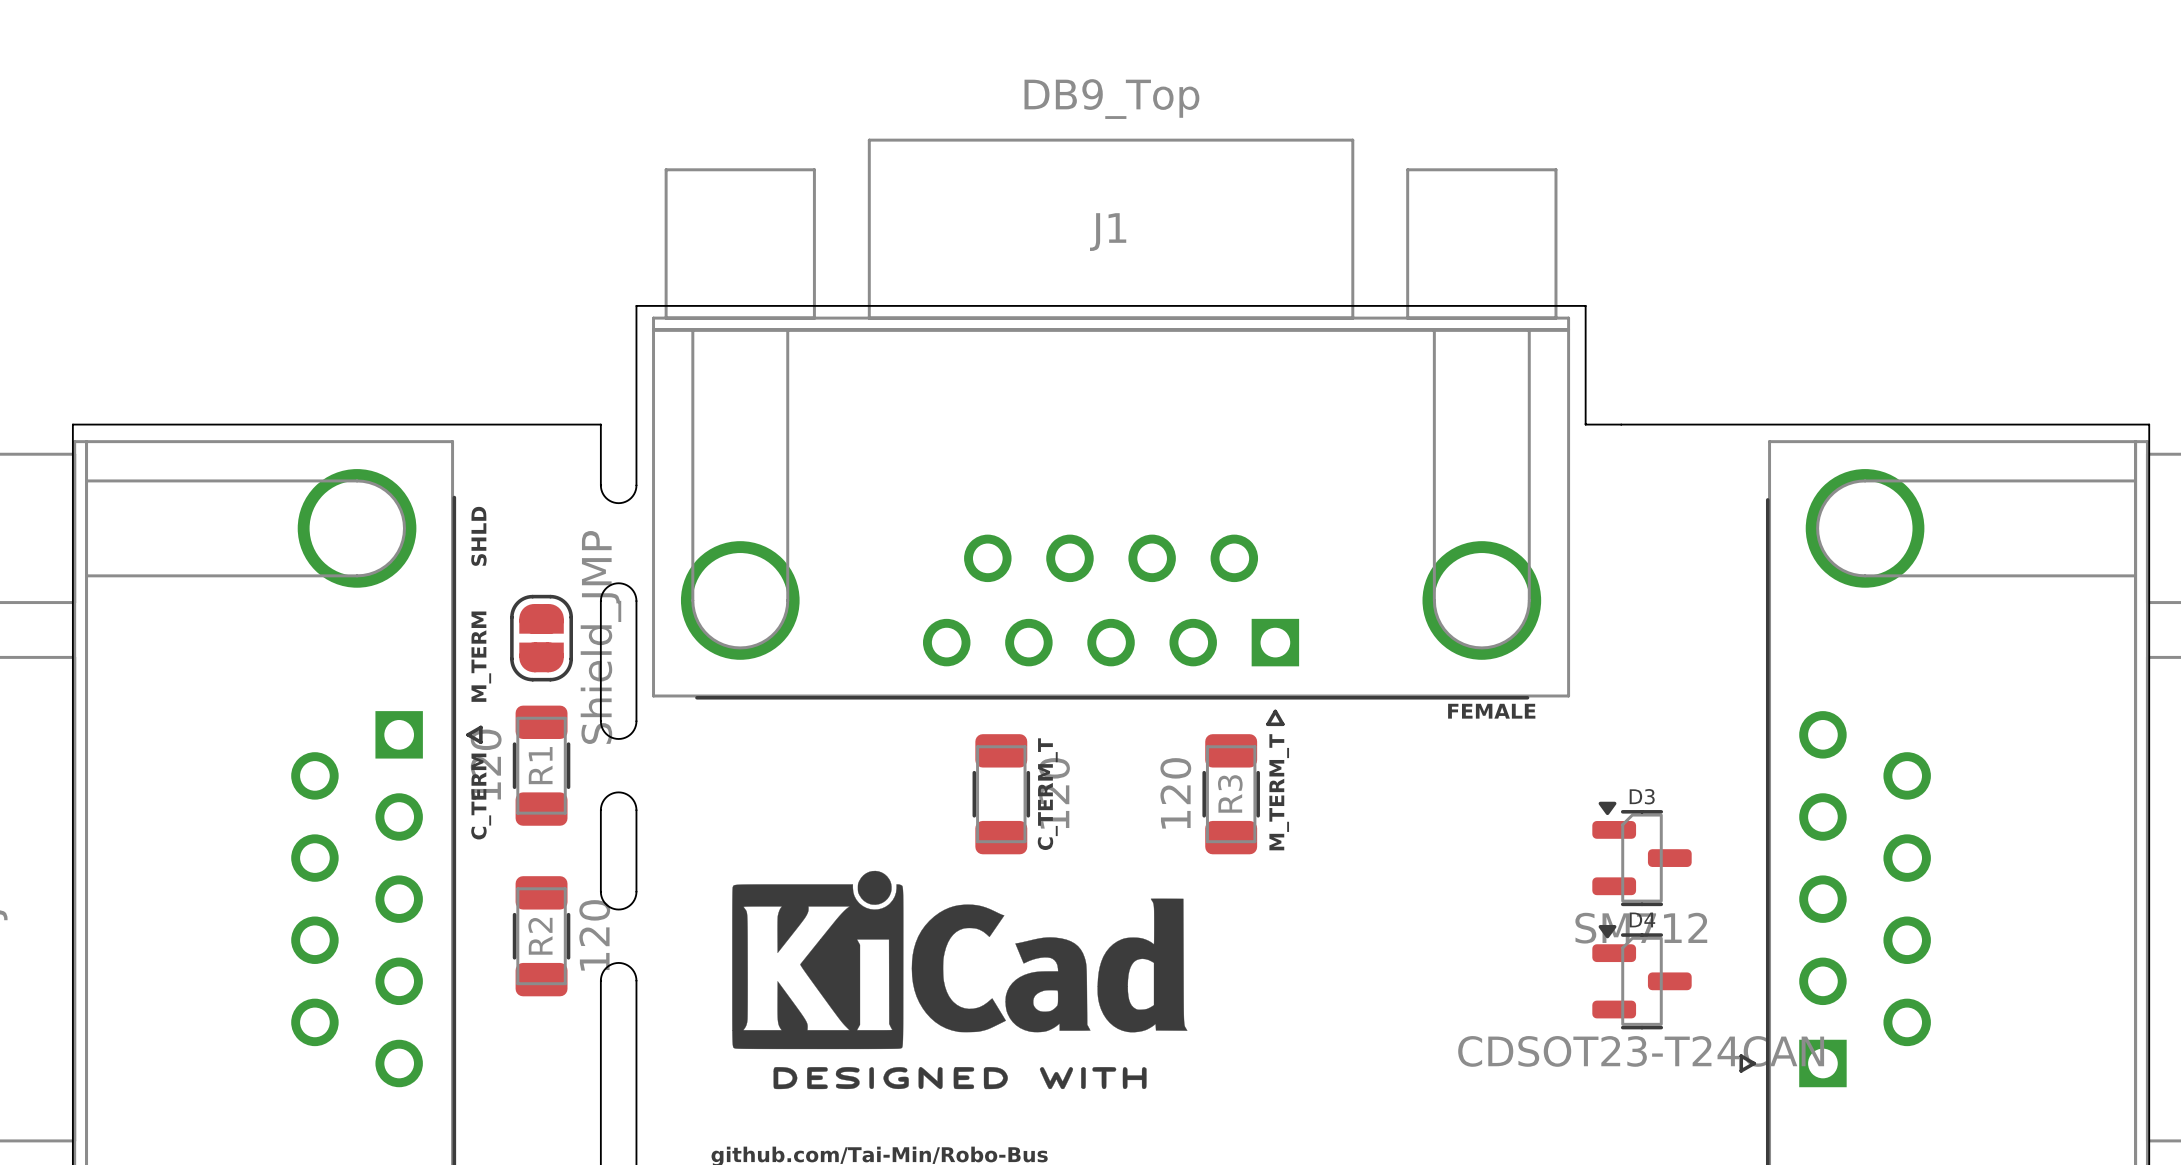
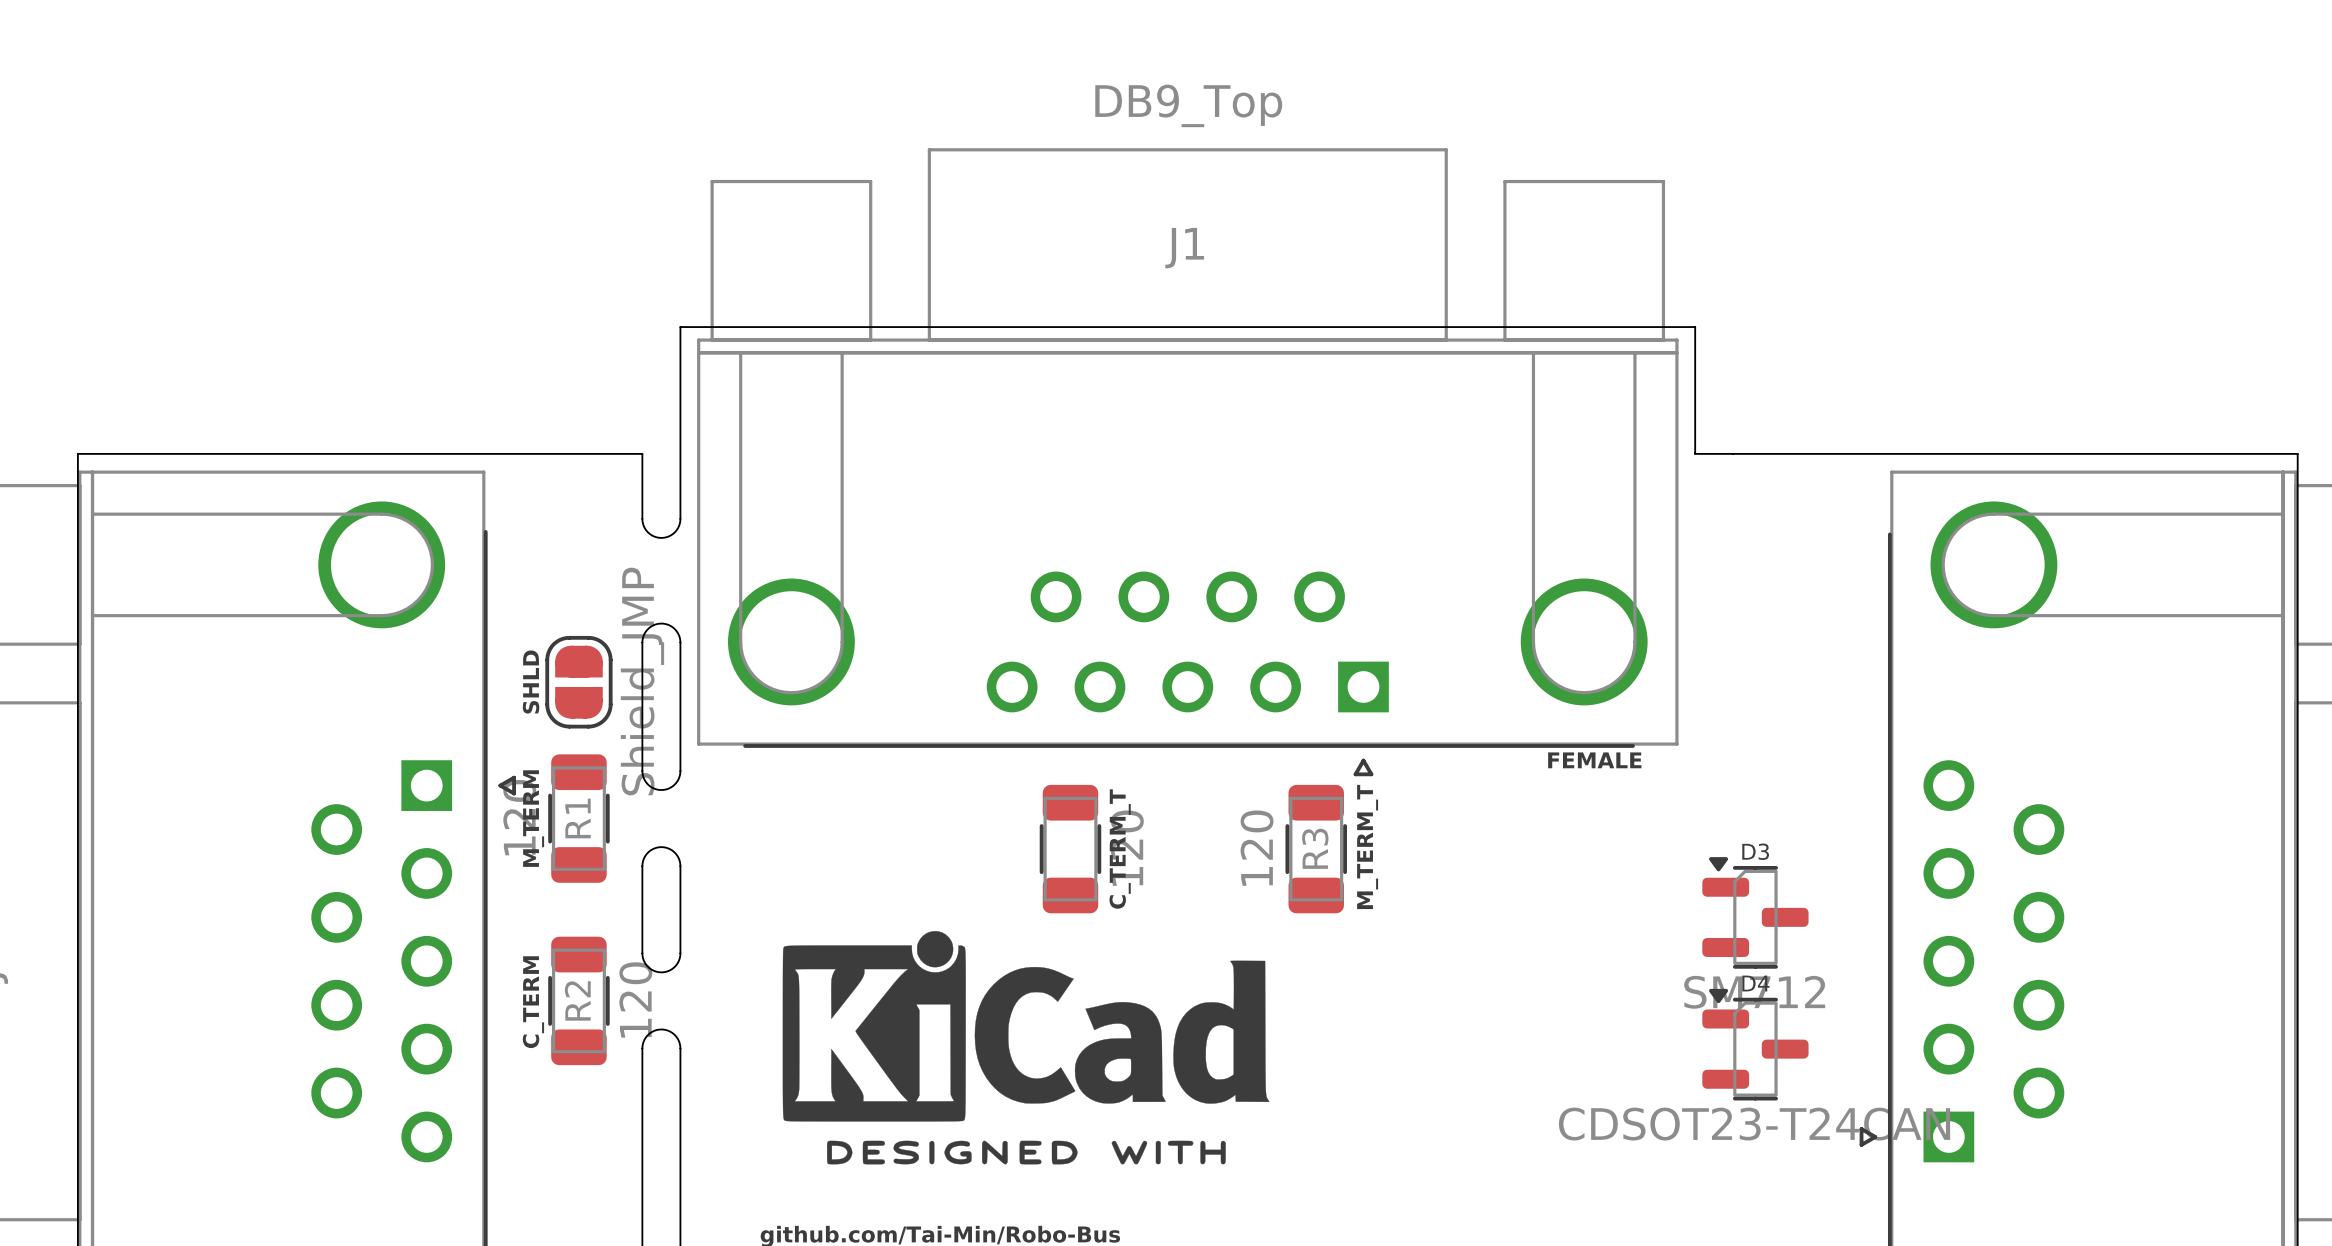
text: SHLD (478, 536) -> none
text: M_TERM (481, 656) -> SHLD (531, 682)
text: none -> M_TERM (533, 818)
text position: C_TERM (481, 796) -> C_TERM (533, 1002)

